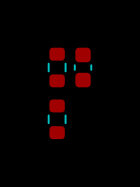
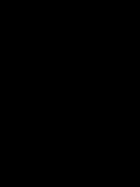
part: (57, 67) -> none
part: (83, 67) -> none
part: (57, 119) -> none

